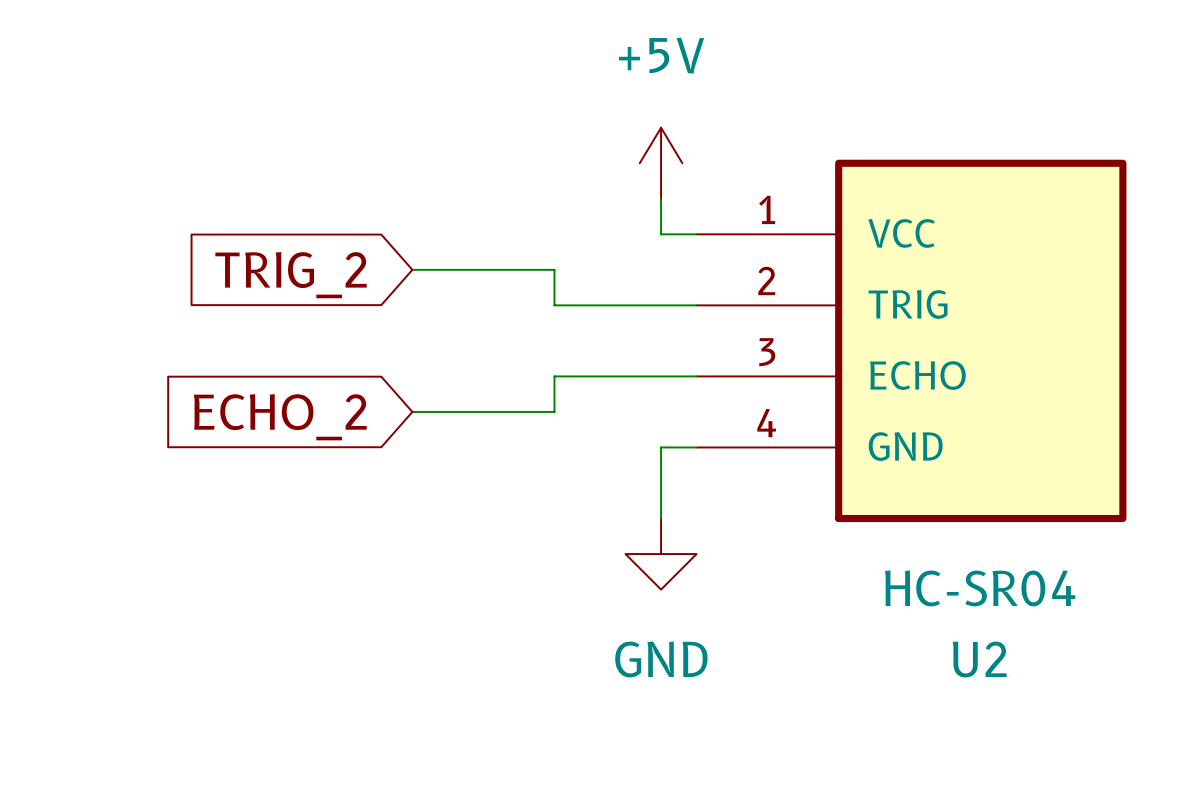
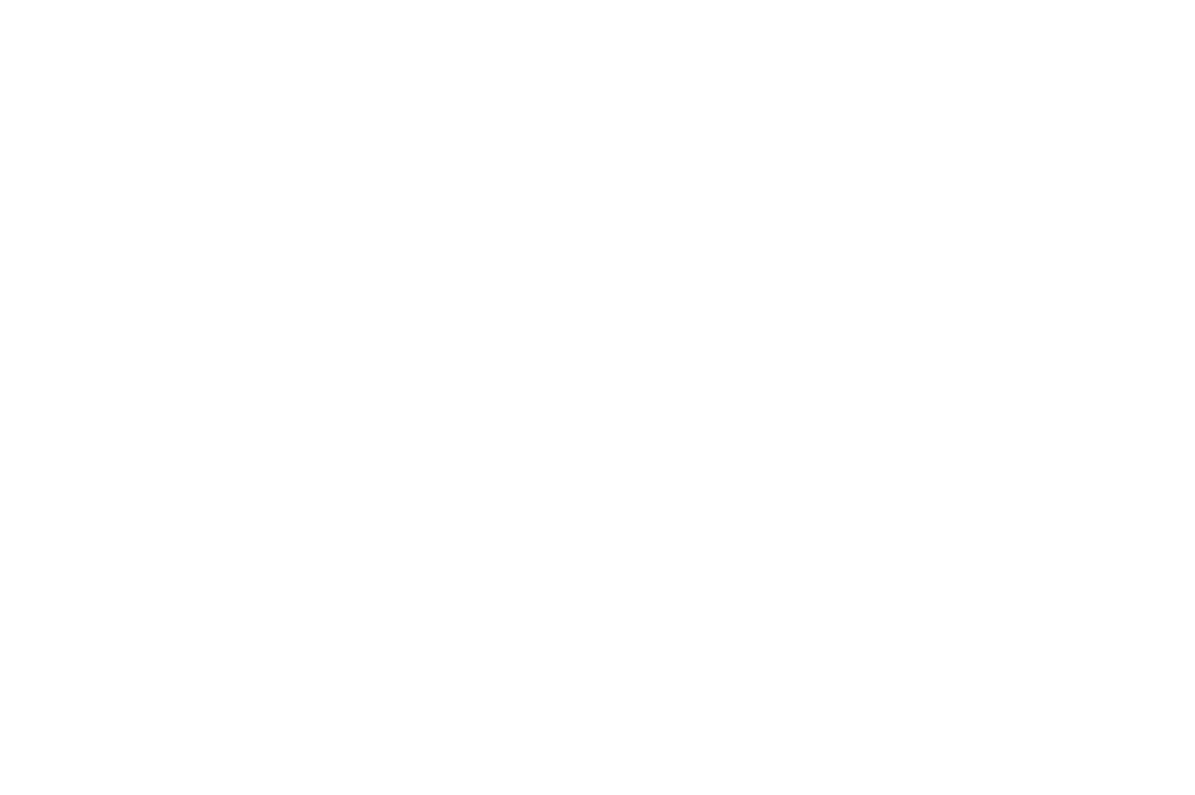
power symbol: +5V (661, 163) -> none
wire: (661, 198) (661, 234) (696, 234) -> none
wire: (412, 269) (554, 269) (554, 305) (696, 305) -> none
global label: TRIG_2 (291, 275) -> none
U2: HC-SR04 (911, 340) -> none
wire: (696, 376) (554, 376) (554, 411) (412, 411) -> none
global label: ECHO_2 (280, 417) -> none
wire: (696, 447) (661, 447) (661, 518) -> none
power symbol: GND (661, 554) -> none

